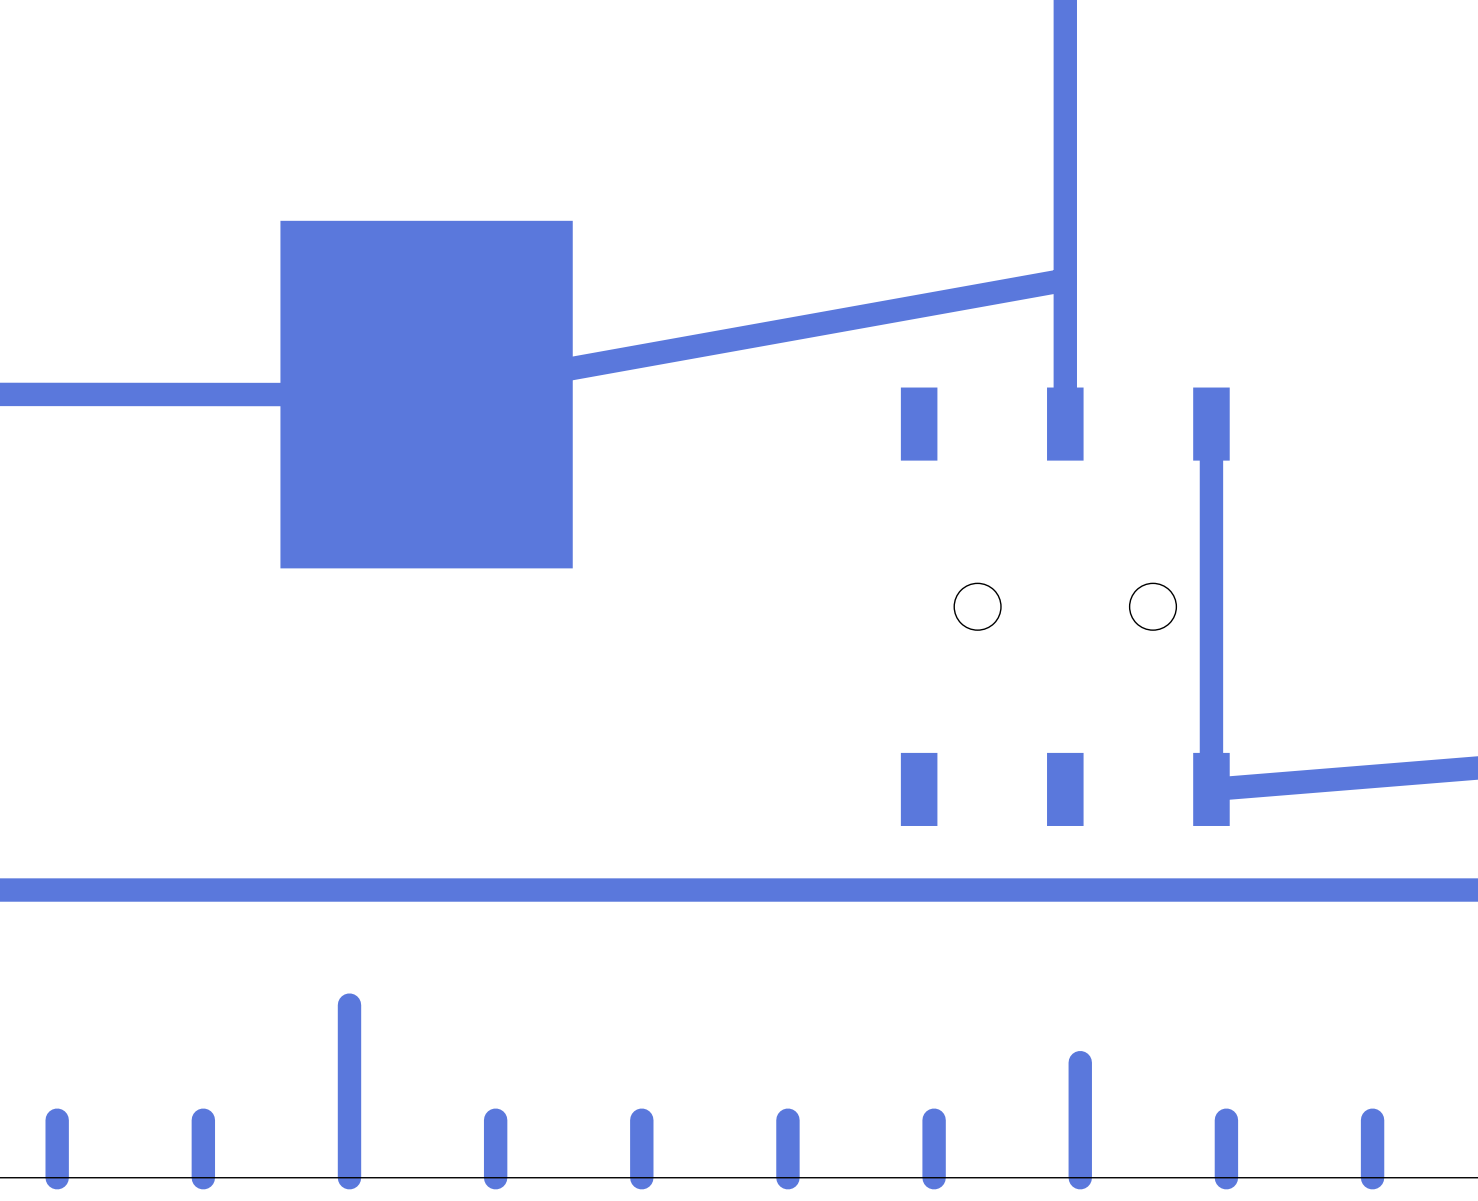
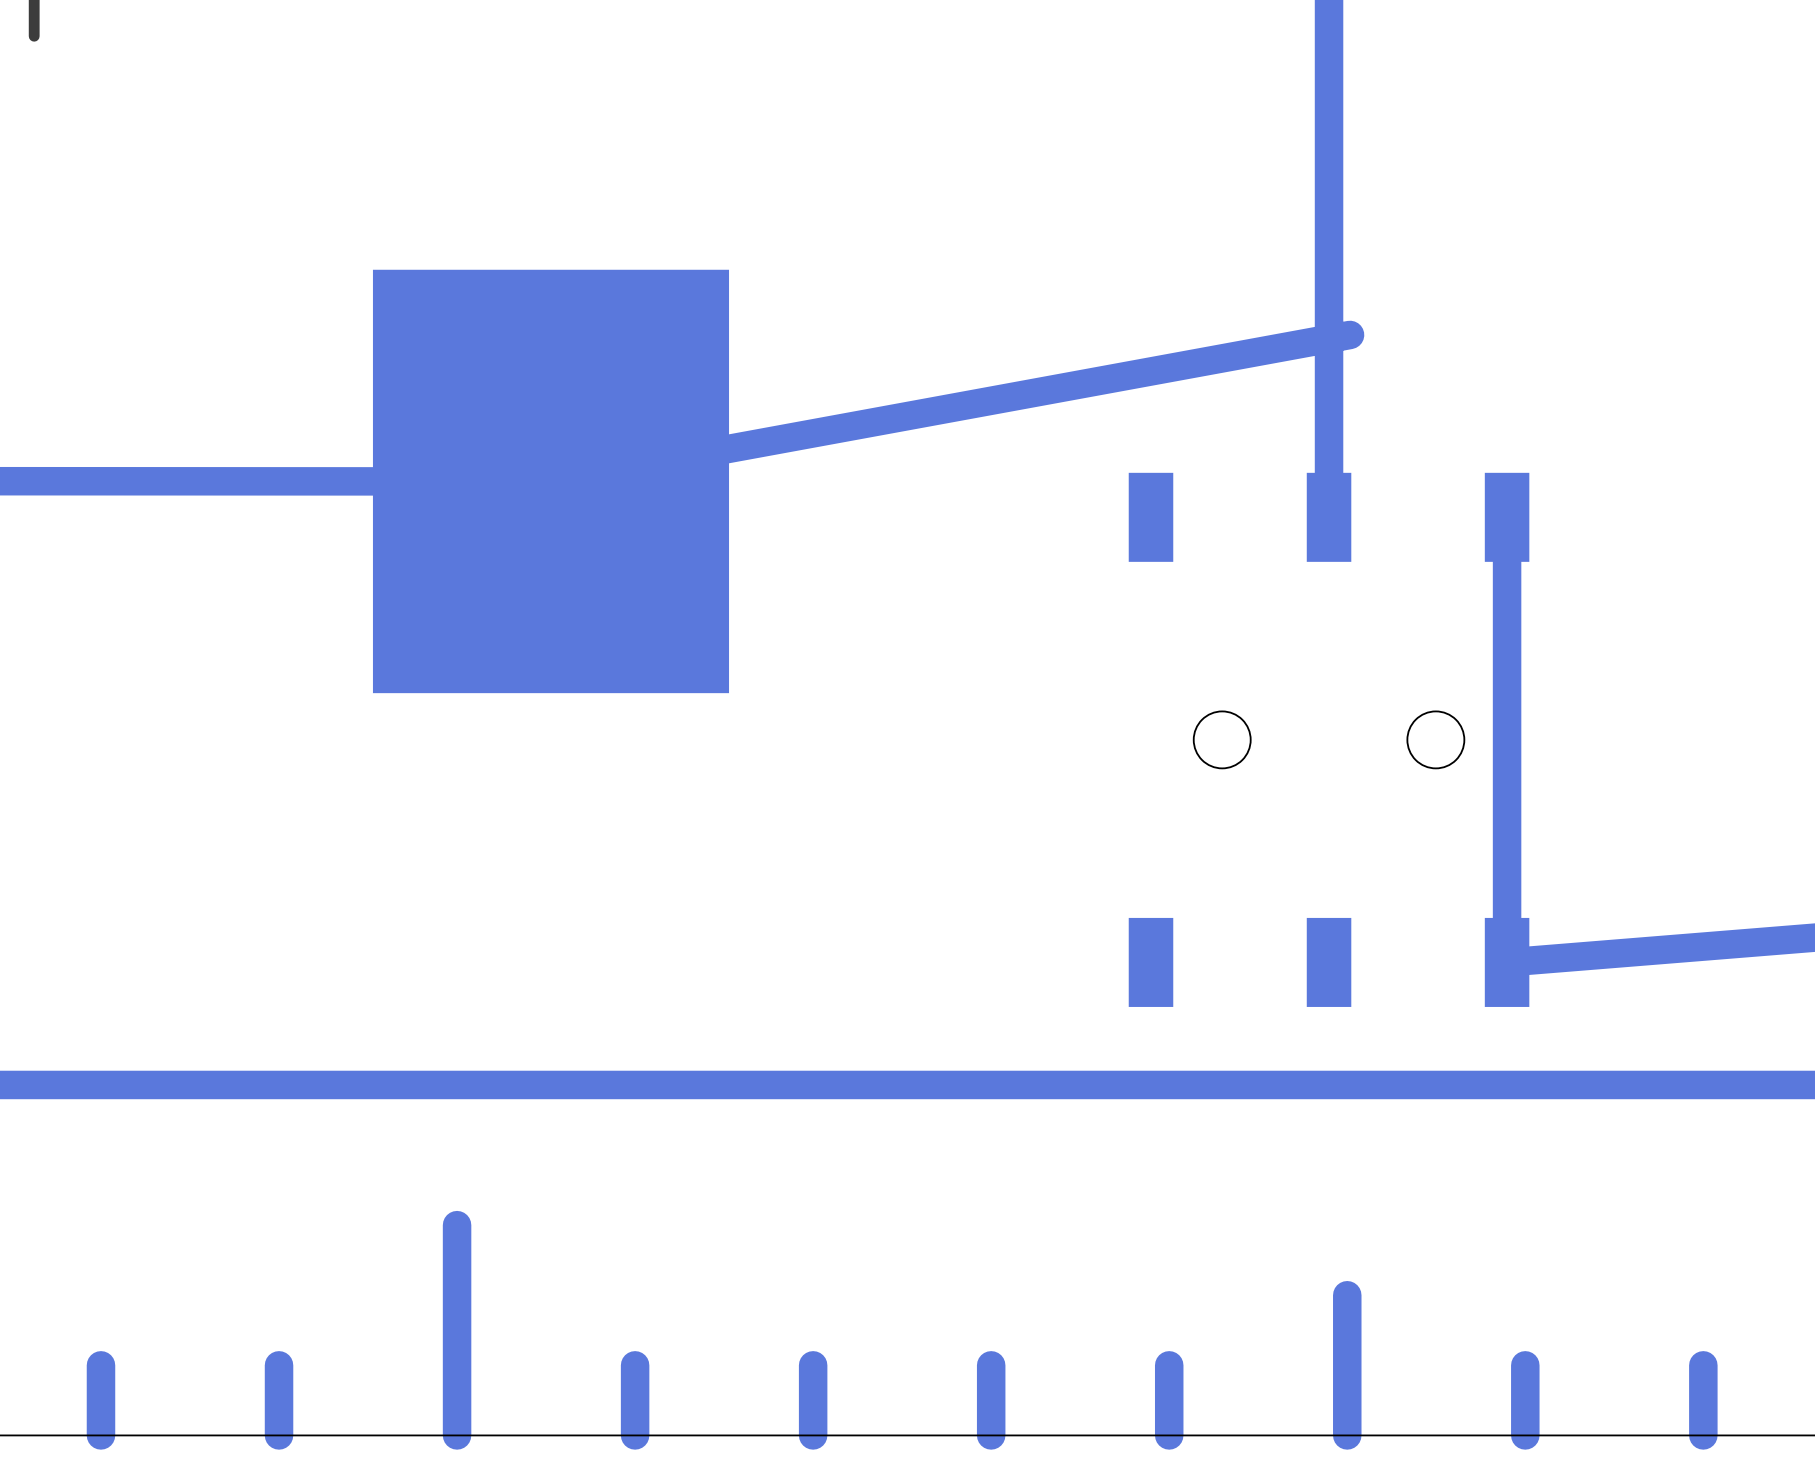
bottom track: (1065, 280) (426, 394) -> (1350, 334) (550, 481)

